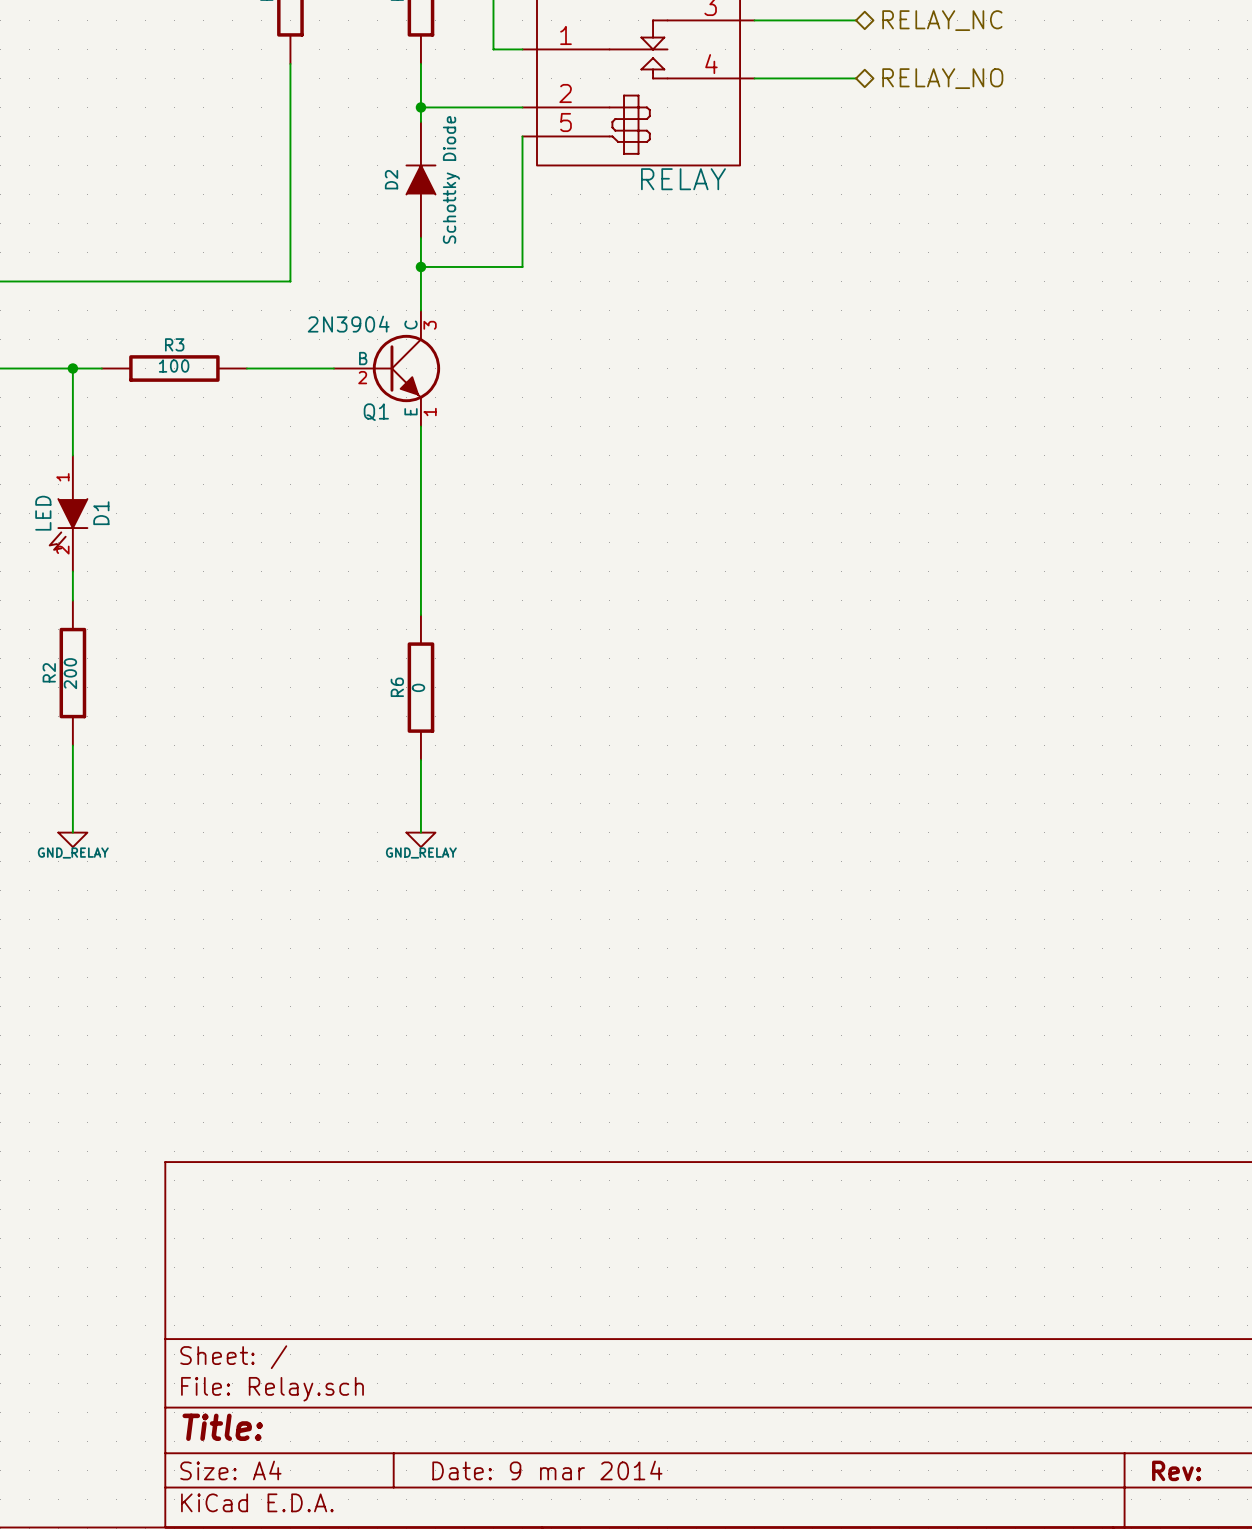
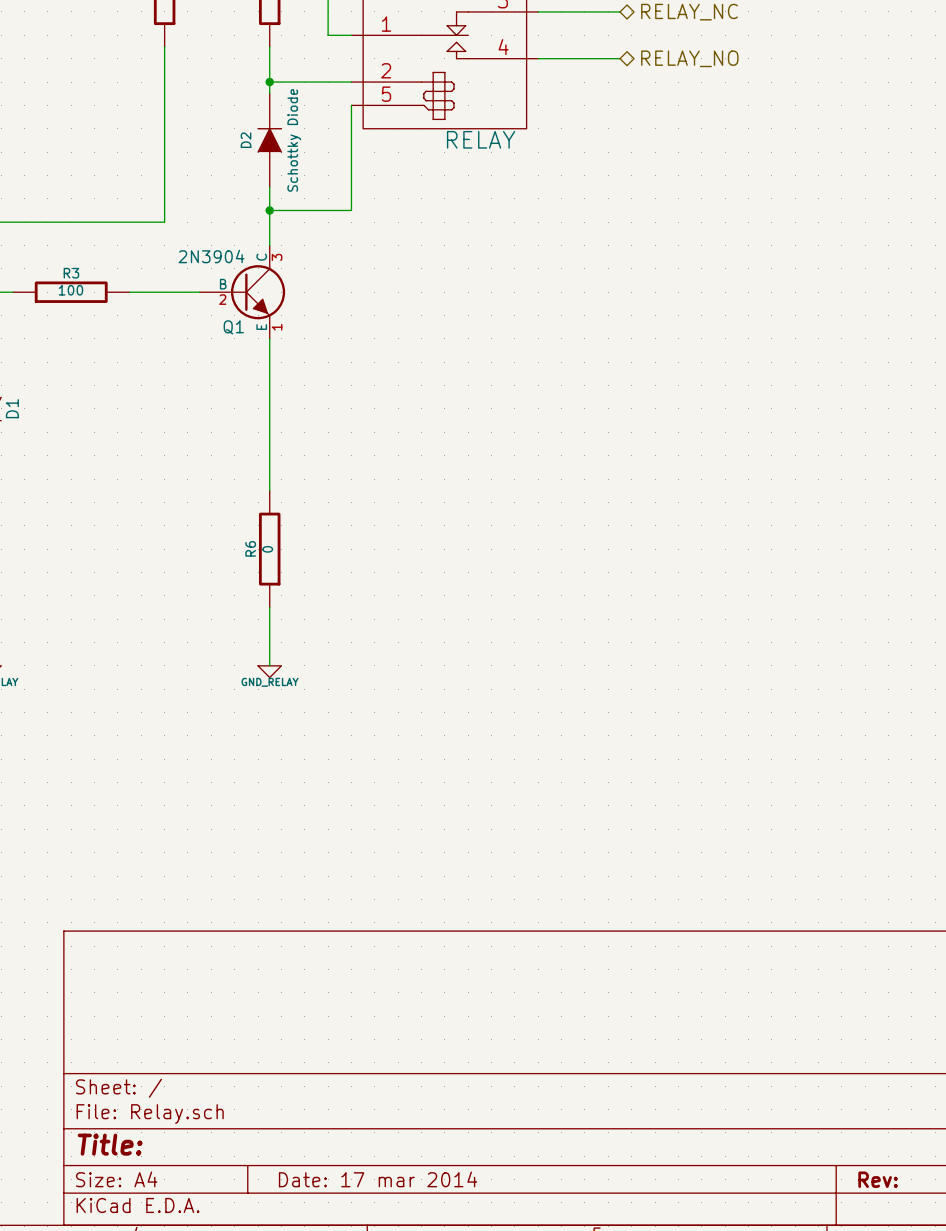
title block: Date: 9 mar 2014 (547, 1470) -> Date: 17 mar 2014 (378, 1179)

